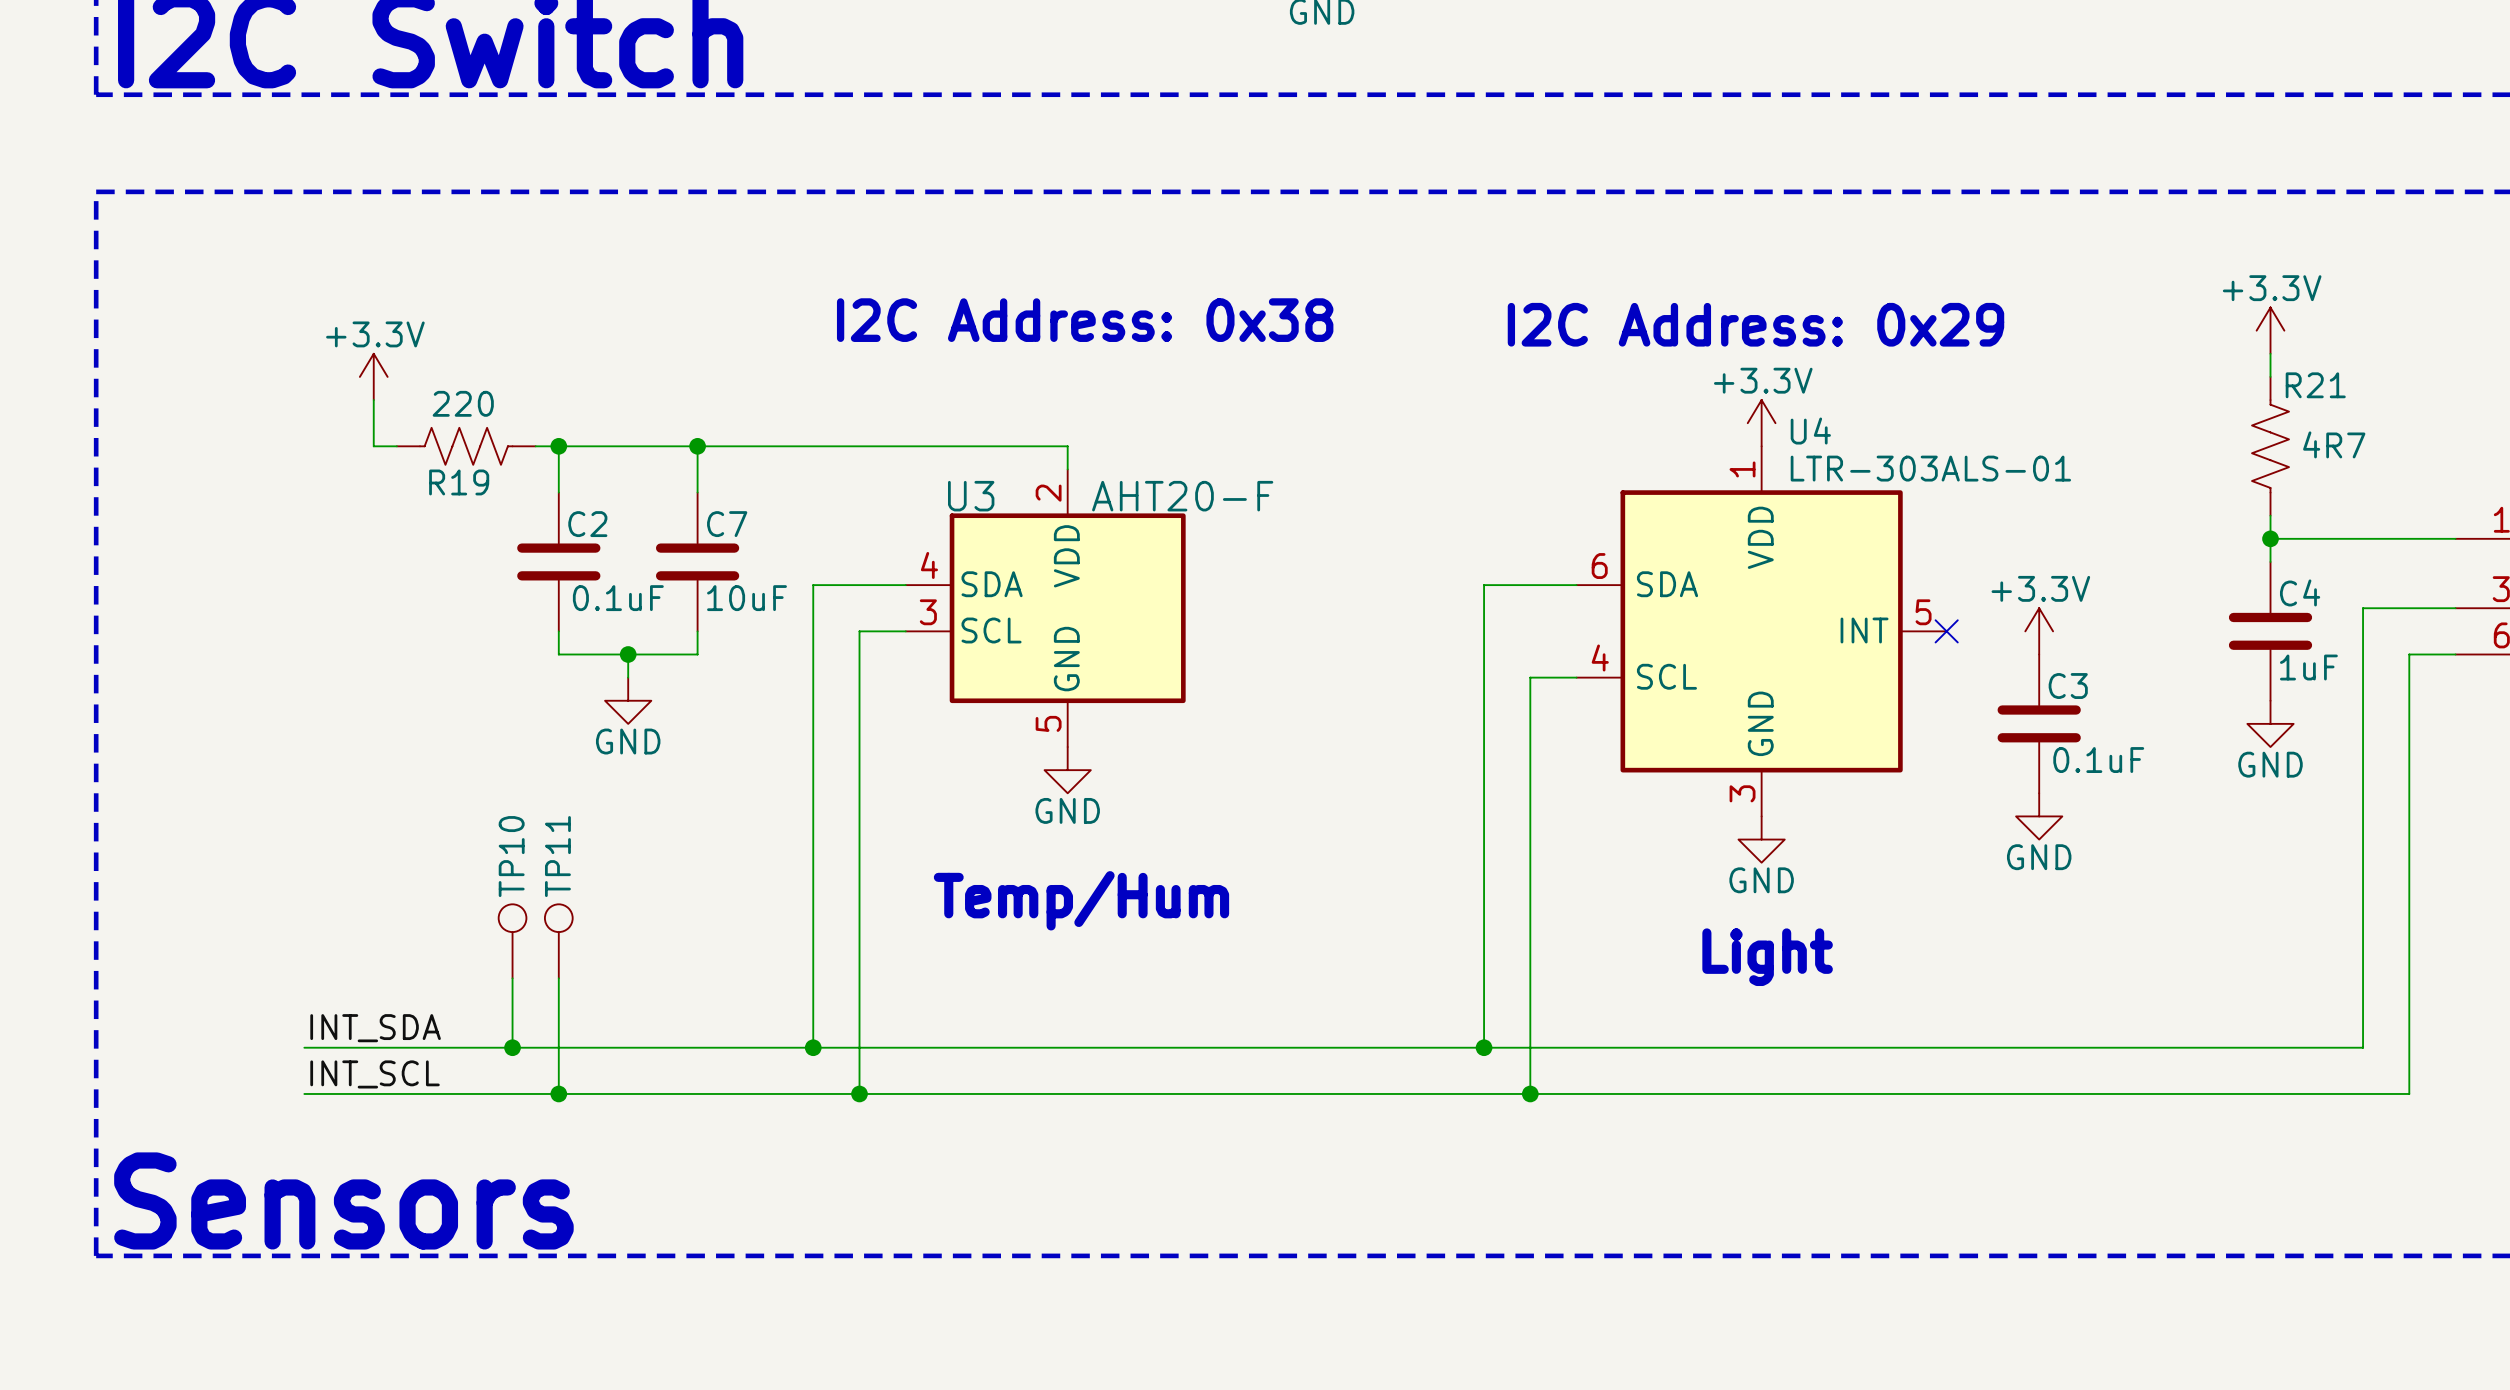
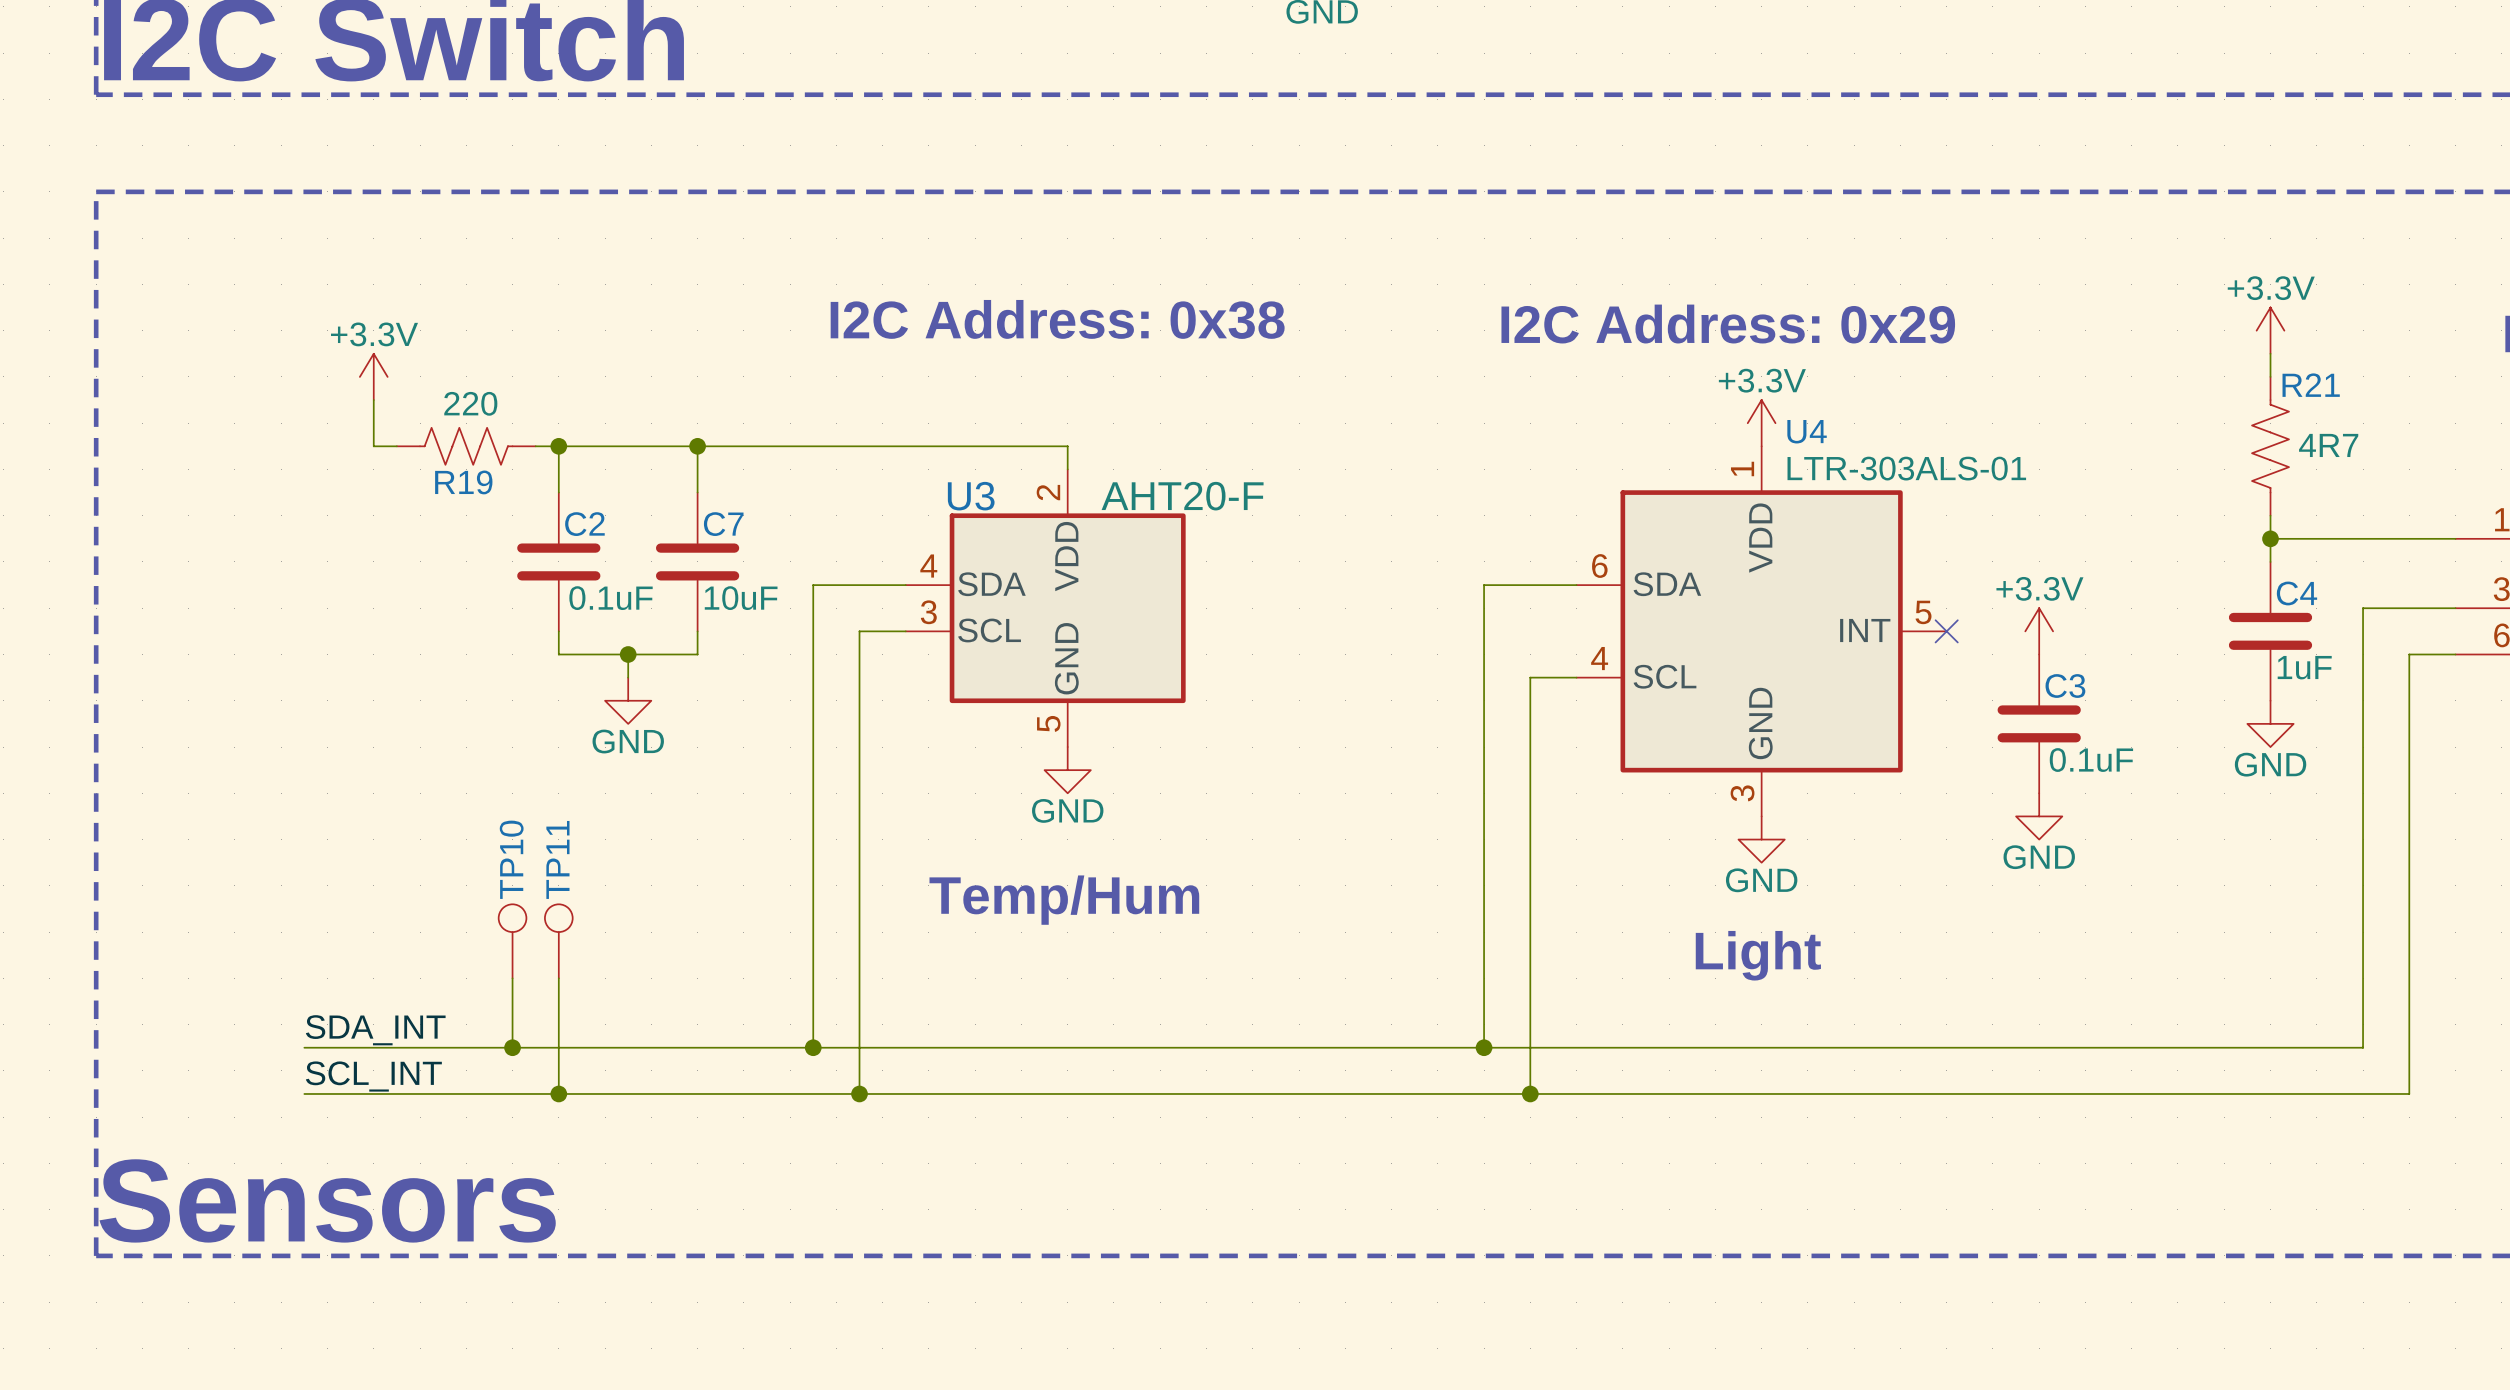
label: INT_SDA (375, 1028) -> SDA_INT (375, 1030)
label: INT_SCL (375, 1074) -> SCL_INT (373, 1076)

